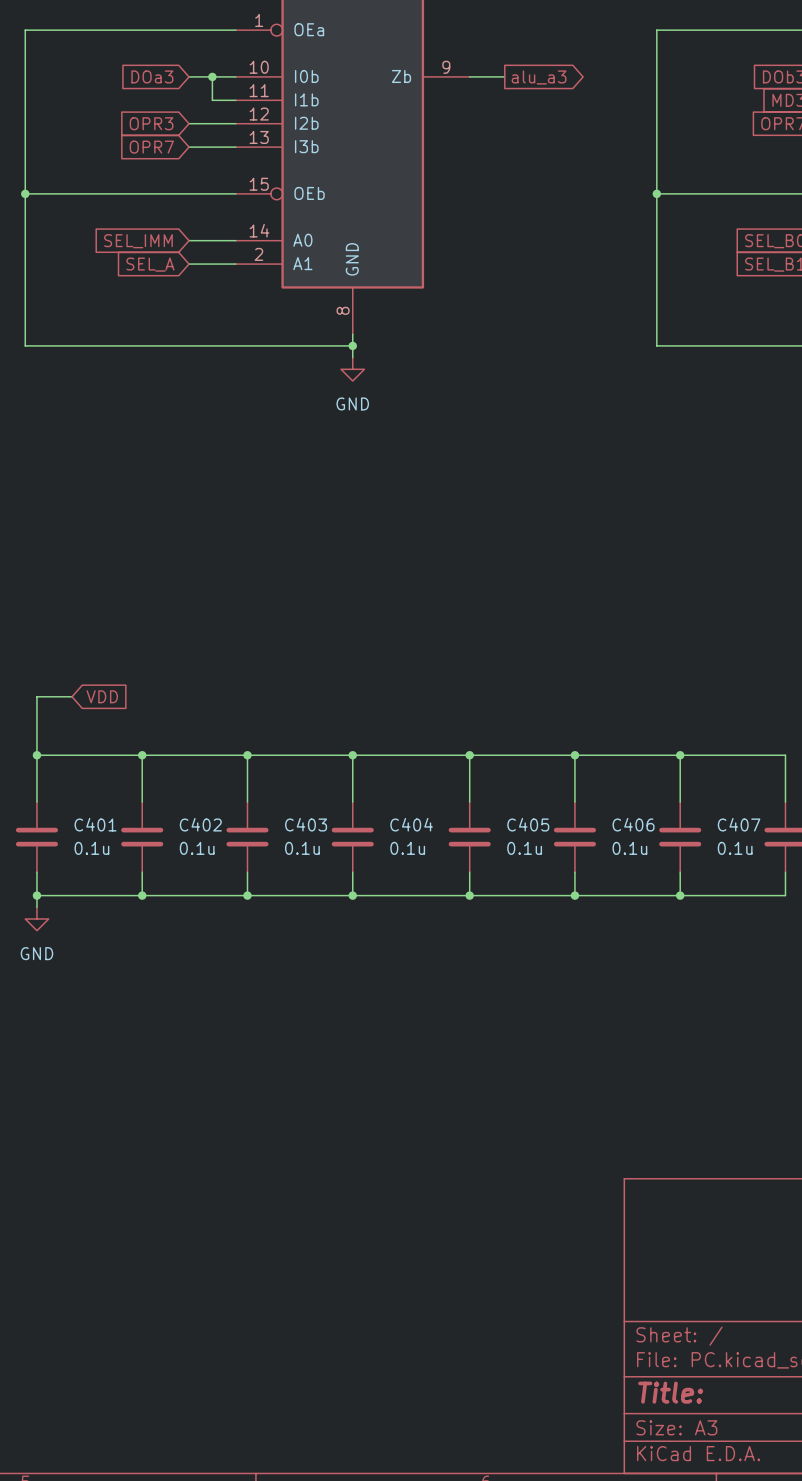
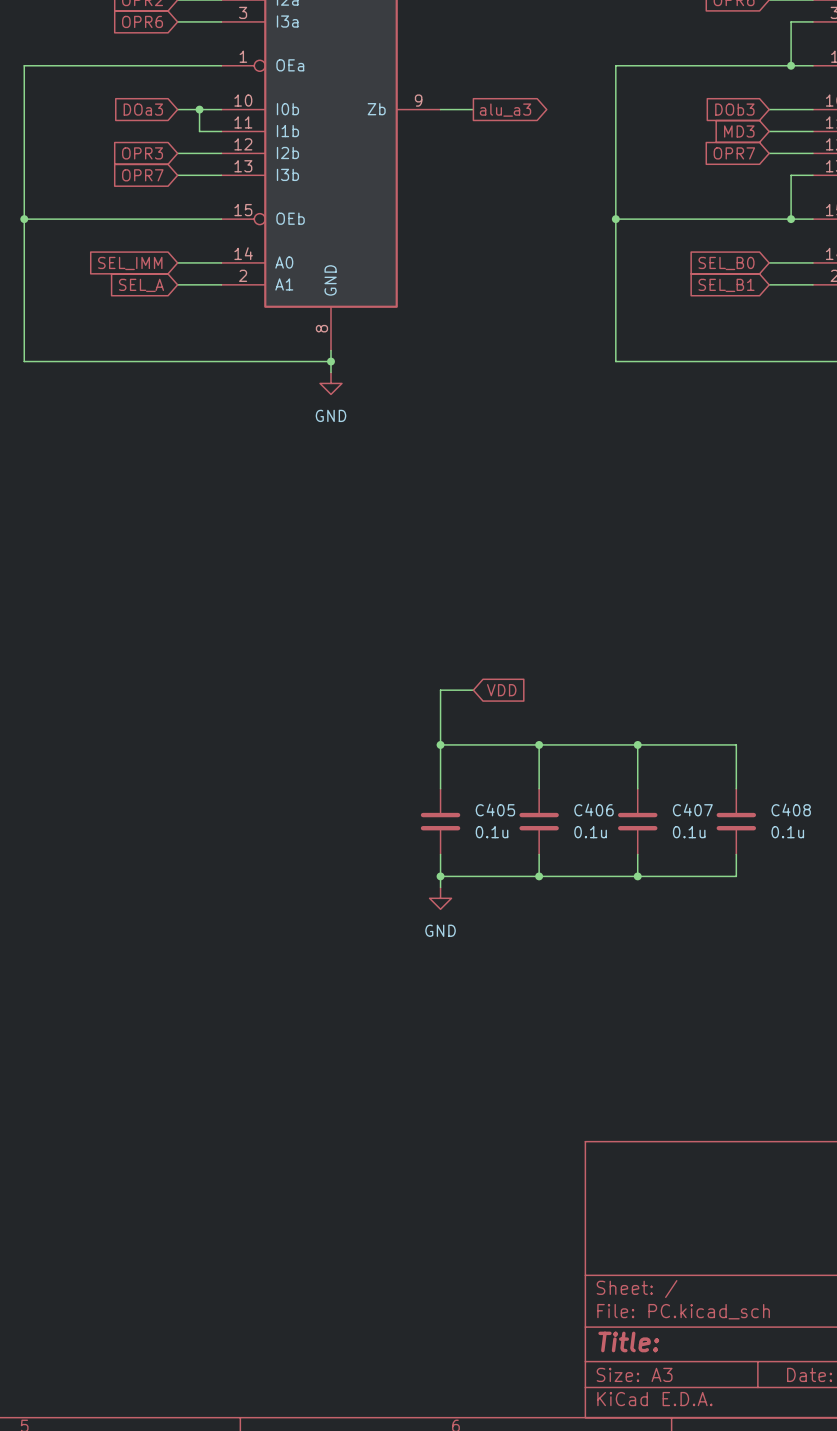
wire: (72, 696) (36, 696) (36, 802) -> none
global label: VDD (102, 696) -> none
global label: none -> VDD (501, 690)
wire: (36, 755) (469, 755) -> (473, 690) (440, 690) (440, 744)
junction: (36, 755) -> none
wire: (142, 755) (142, 802) -> none
junction: (142, 755) -> none
wire: (247, 755) (247, 802) -> none
junction: (247, 755) -> none
wire: (352, 755) (352, 802) -> none
junction: (352, 755) -> none
C401: 0.1u (36, 837) -> none
C402: 0.1u (142, 837) -> none
C403: 0.1u (247, 837) -> none
C404: 0.1u (352, 837) -> none
wire: (36, 872) (36, 907) -> none
wire: (142, 872) (142, 895) -> none
wire: (247, 872) (247, 895) -> none
wire: (352, 872) (352, 895) -> none
wire: (36, 895) (469, 895) -> (440, 887) (440, 876)
junction: (36, 895) -> none
junction: (142, 895) -> none
junction: (247, 895) -> none
junction: (352, 895) -> none
power symbol: GND (36, 918) -> none
power symbol: none -> GND (440, 898)

